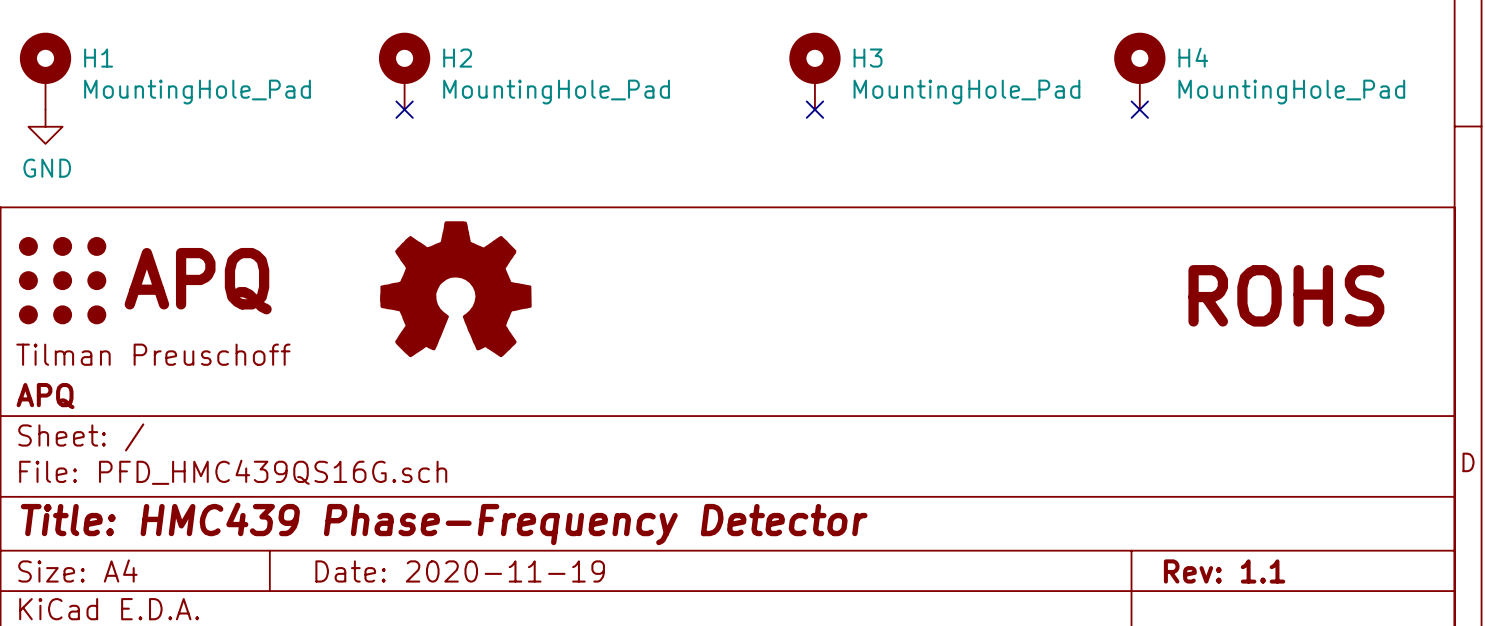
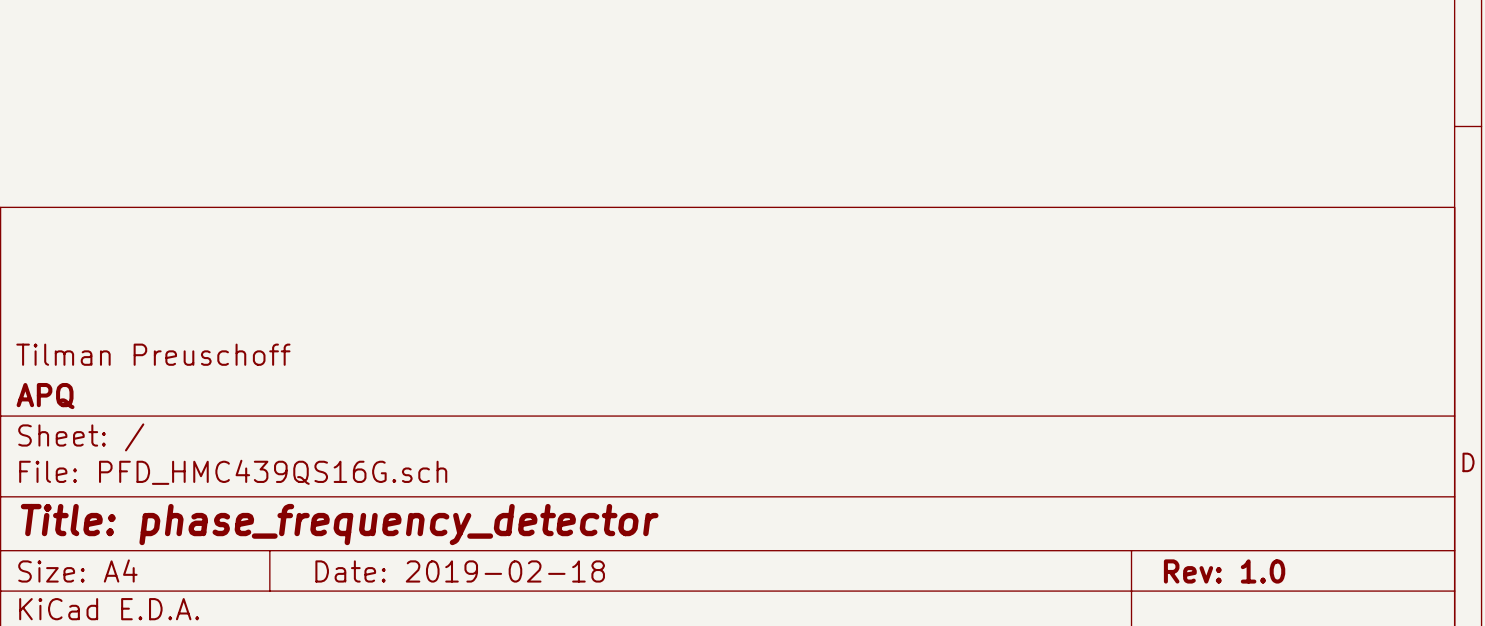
H1: MountingHole_Pad (45, 71) -> none
H2: MountingHole_Pad (404, 71) -> none
H3: MountingHole_Pad (814, 71) -> none
H4: MountingHole_Pad (1139, 71) -> none
no-connect mark: (404, 109) -> none
no-connect mark: (814, 109) -> none
no-connect mark: (1139, 109) -> none
power symbol: GND (45, 126) -> none
part: (62, 280) -> none
part: (455, 289) -> none
part: (1286, 295) -> none
title block: Title: HMC439 Phase-Frequency Detector (444, 523) -> Title: phase_frequency_detector (339, 524)
title block: Date: 2020-11-19 (460, 571) -> Date: 2019-02-18 (460, 571)
title block: Rev: 1.1 (1224, 571) -> Rev: 1.0 (1224, 571)

